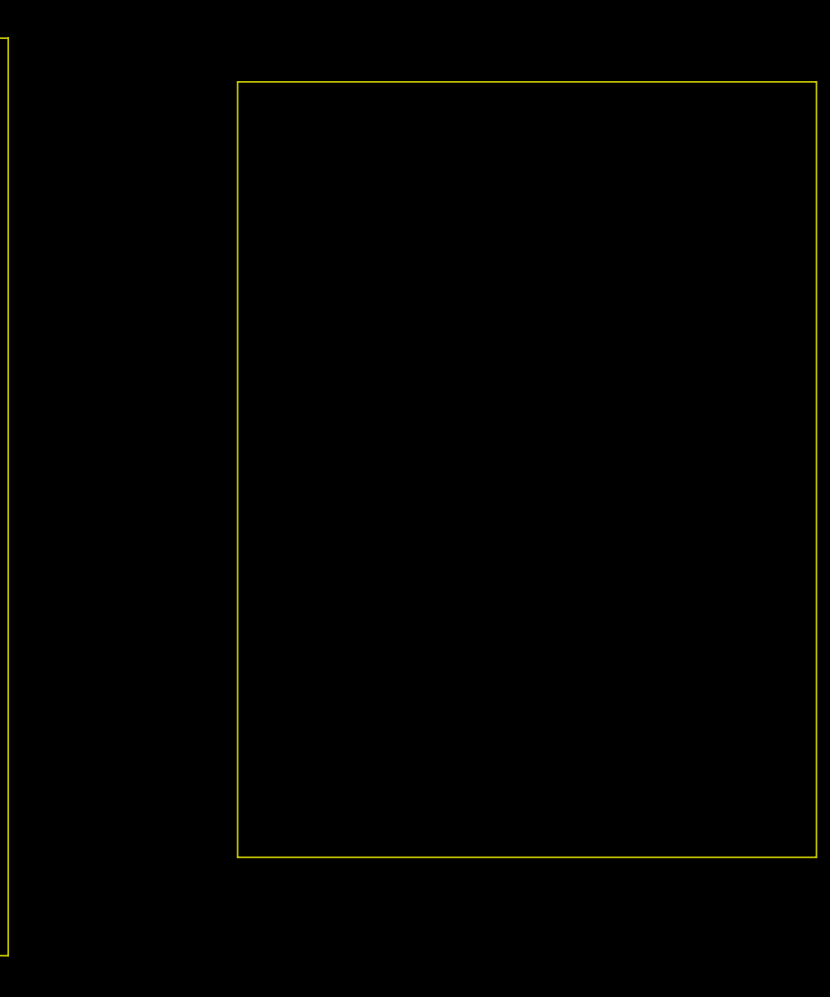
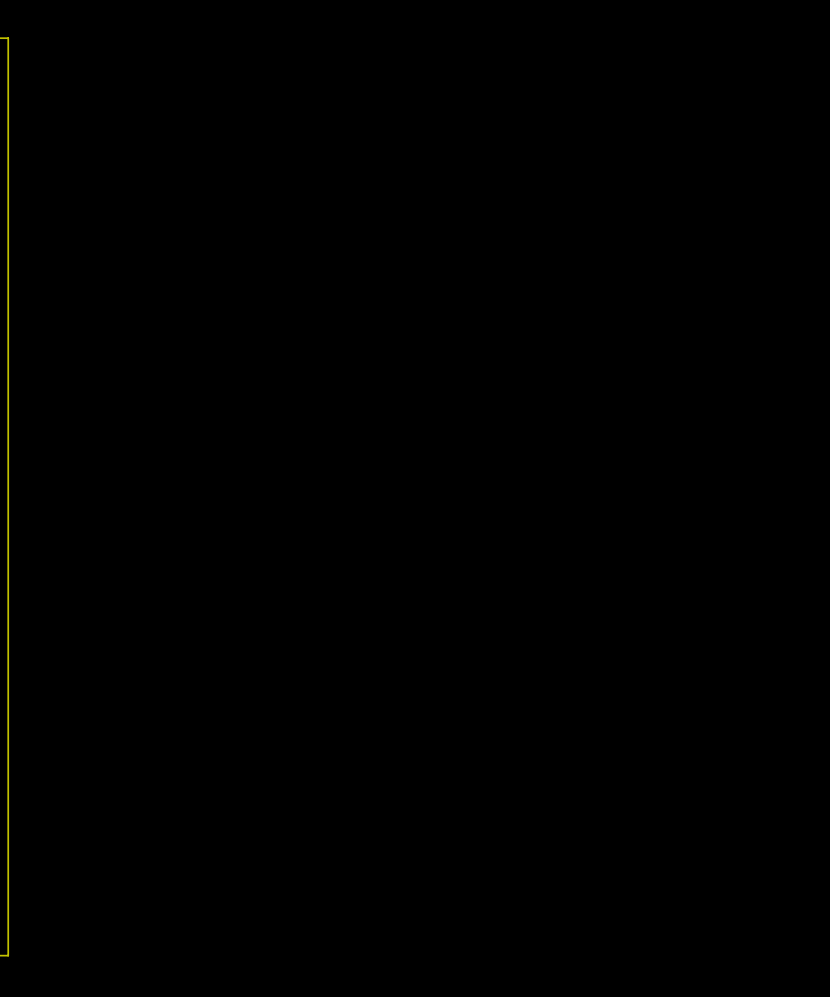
board edge: (237, 81) (816, 81) (816, 857) (237, 857) (237, 81) -> none

